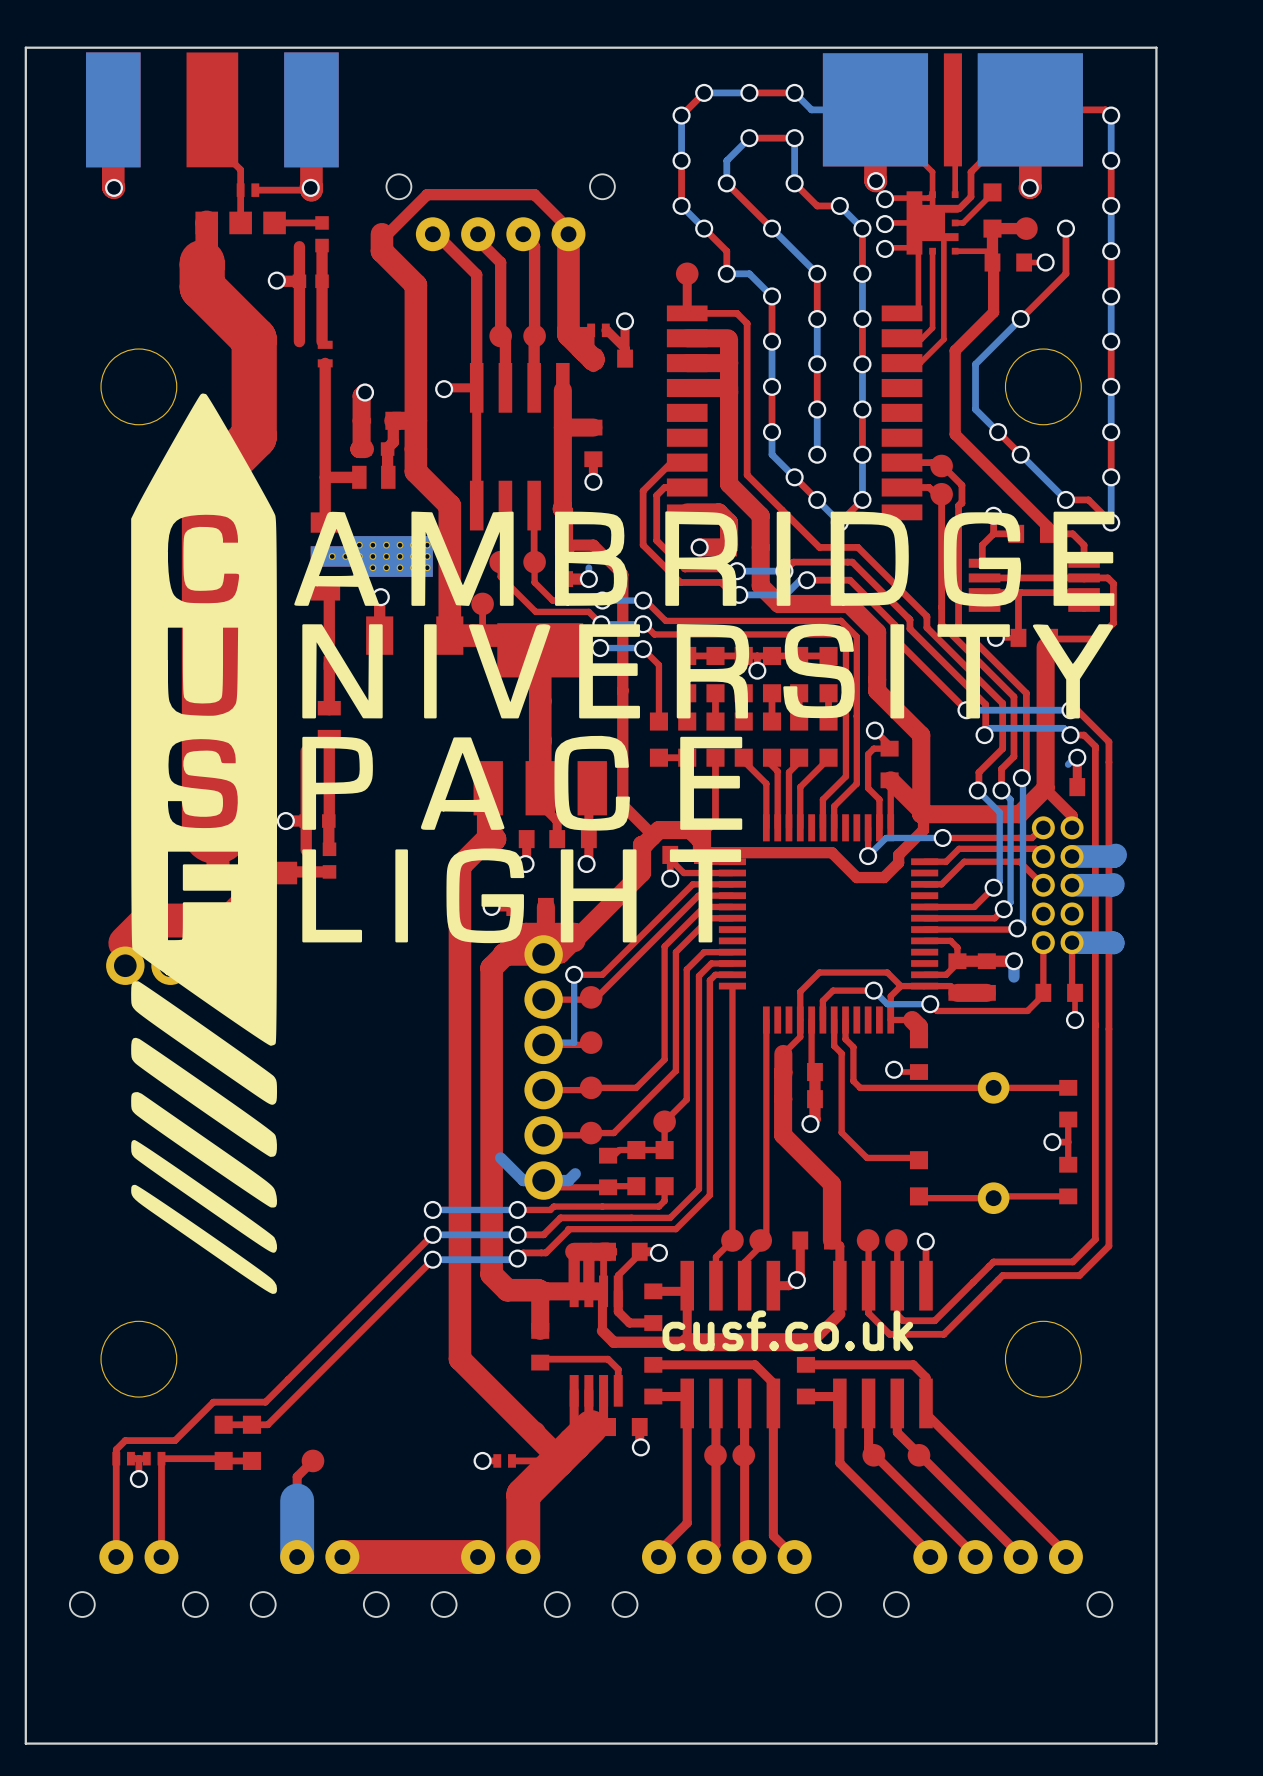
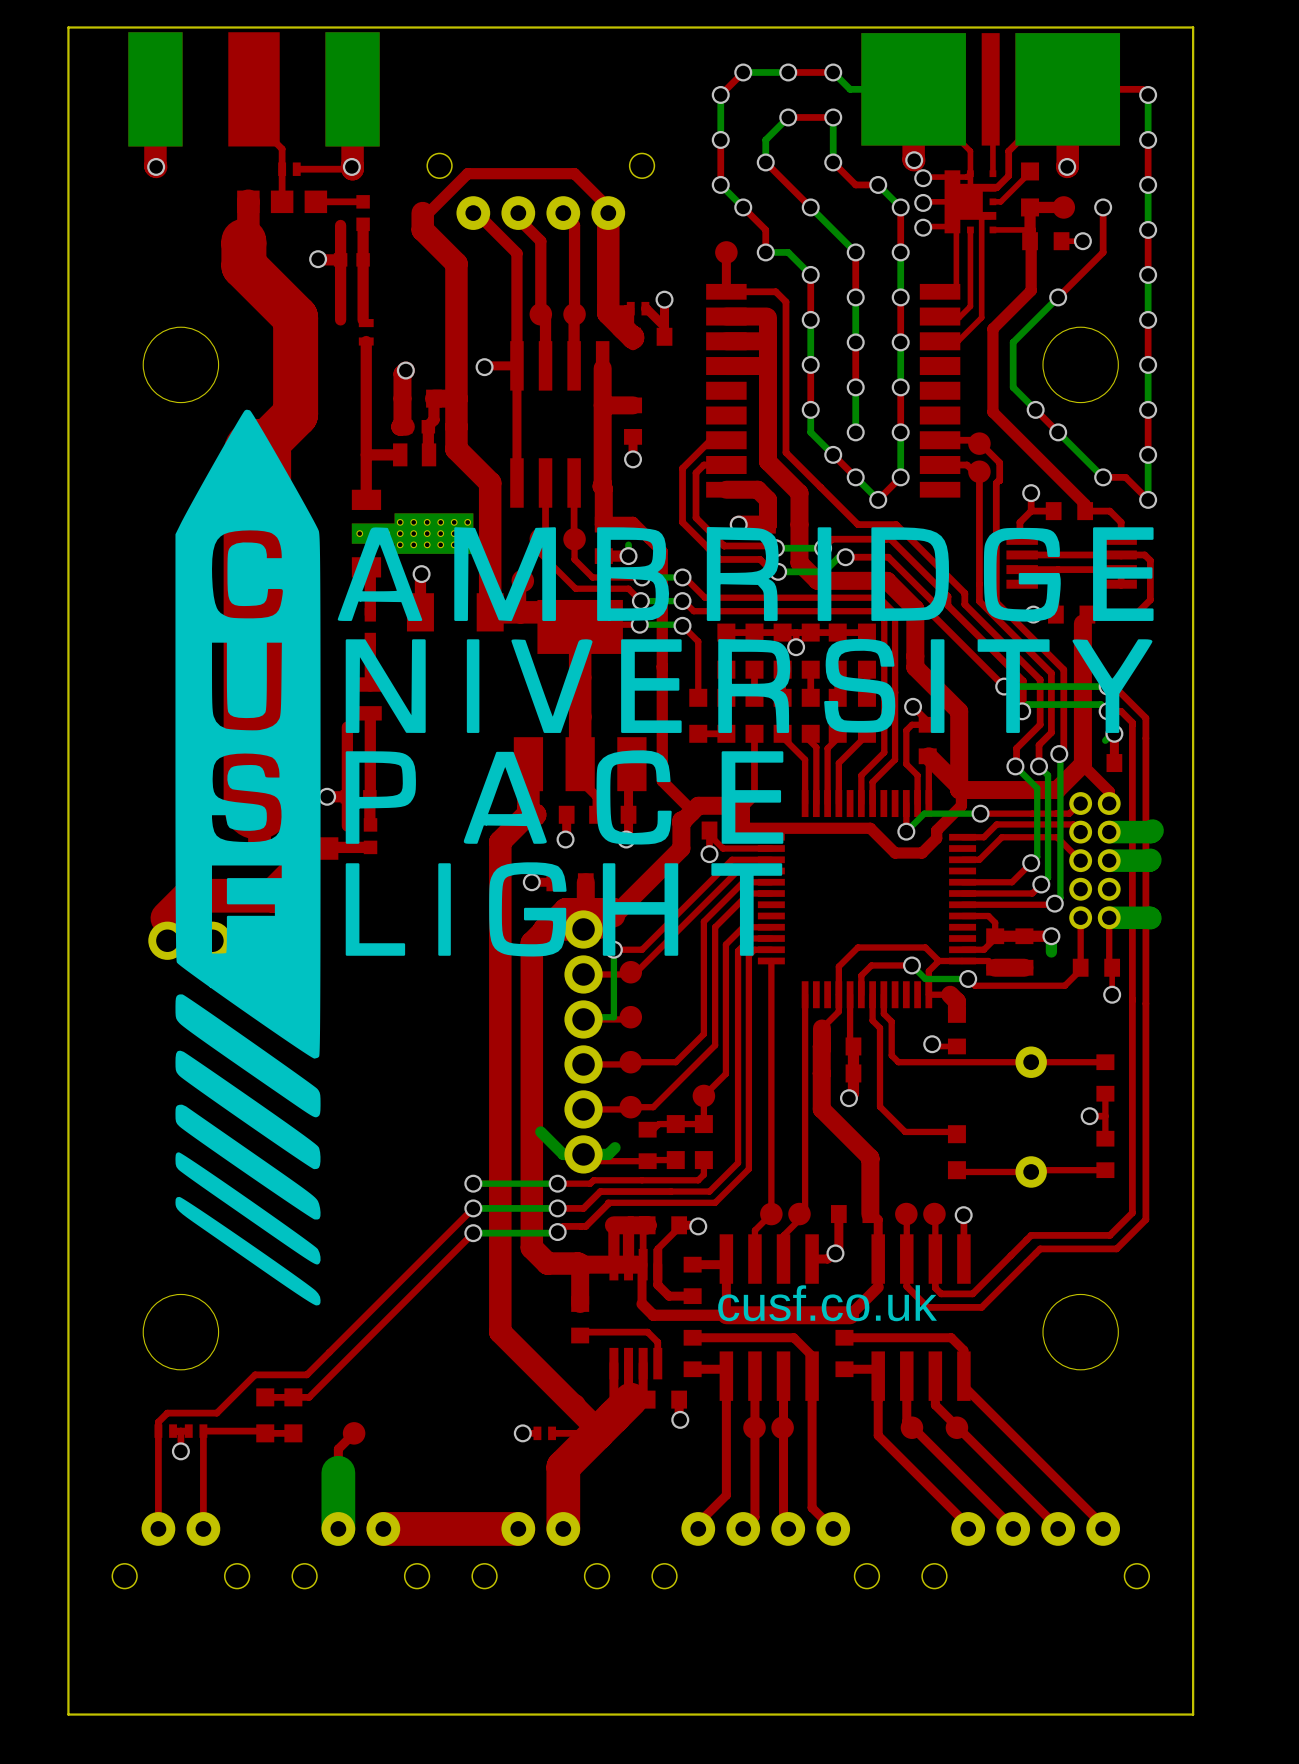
drawing position: (622, 843) -> (664, 857)

